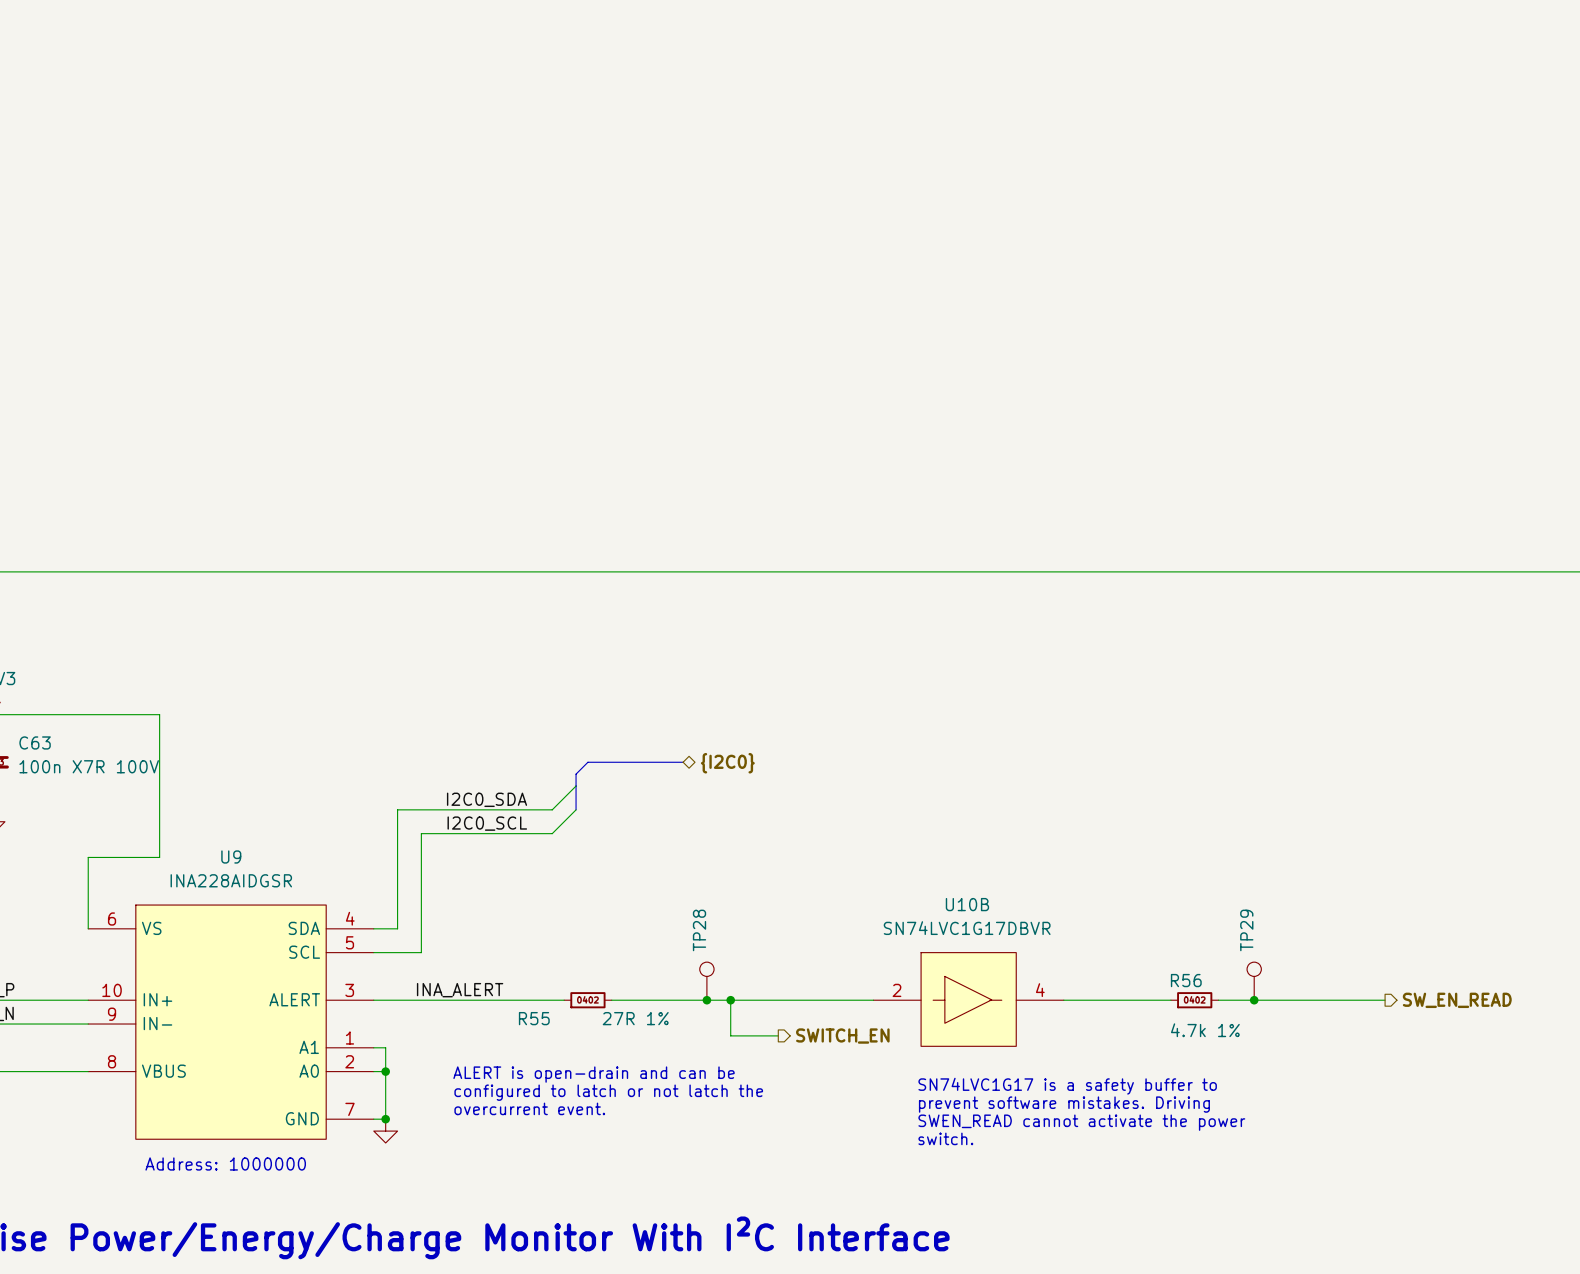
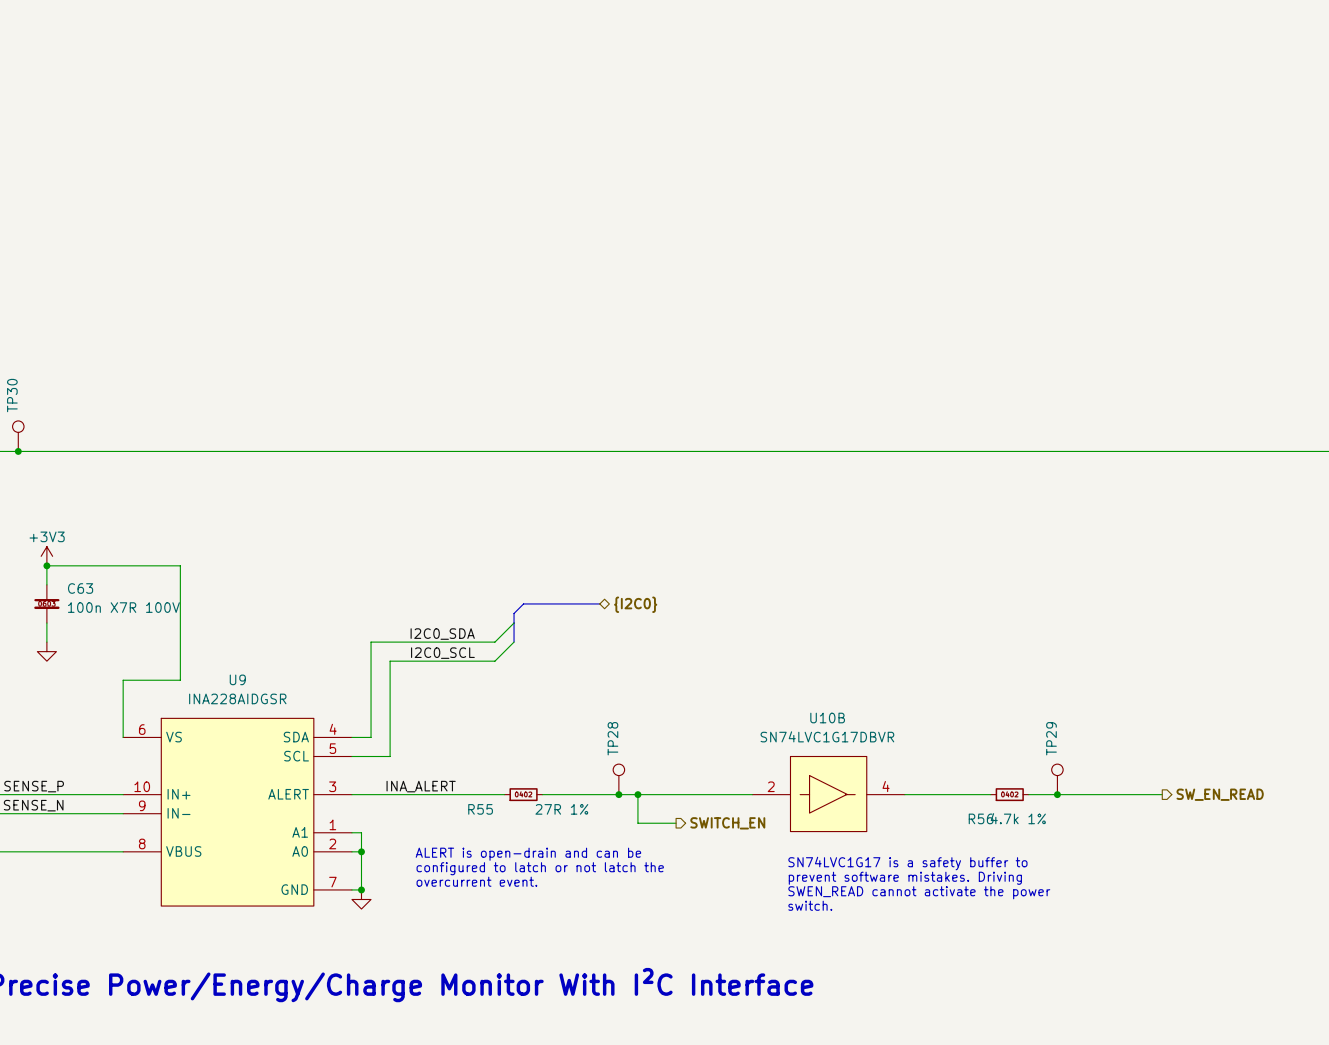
R56 name position: R56 (1186, 980) -> R56 (981, 818)
text: Address: 1000000 (225, 1163) -> none

